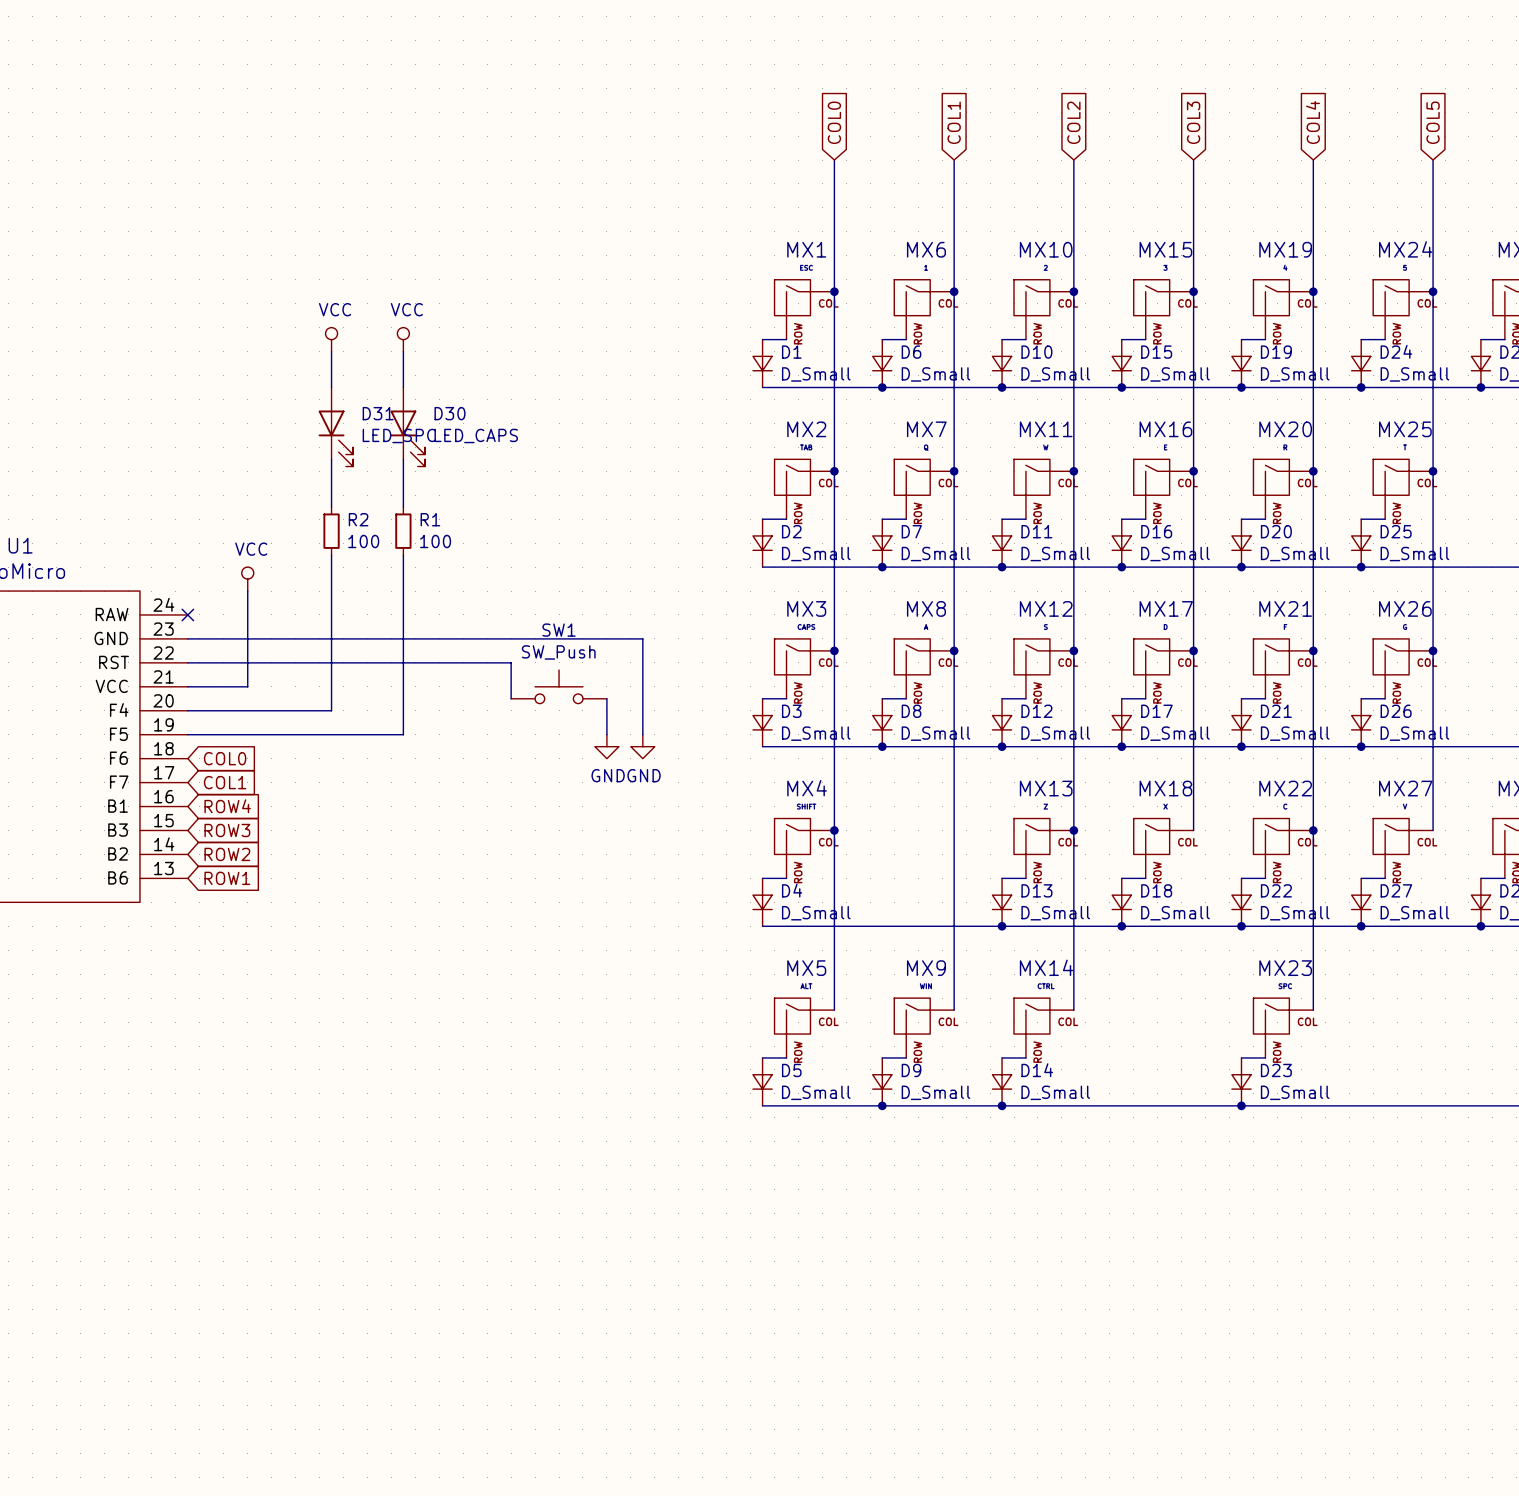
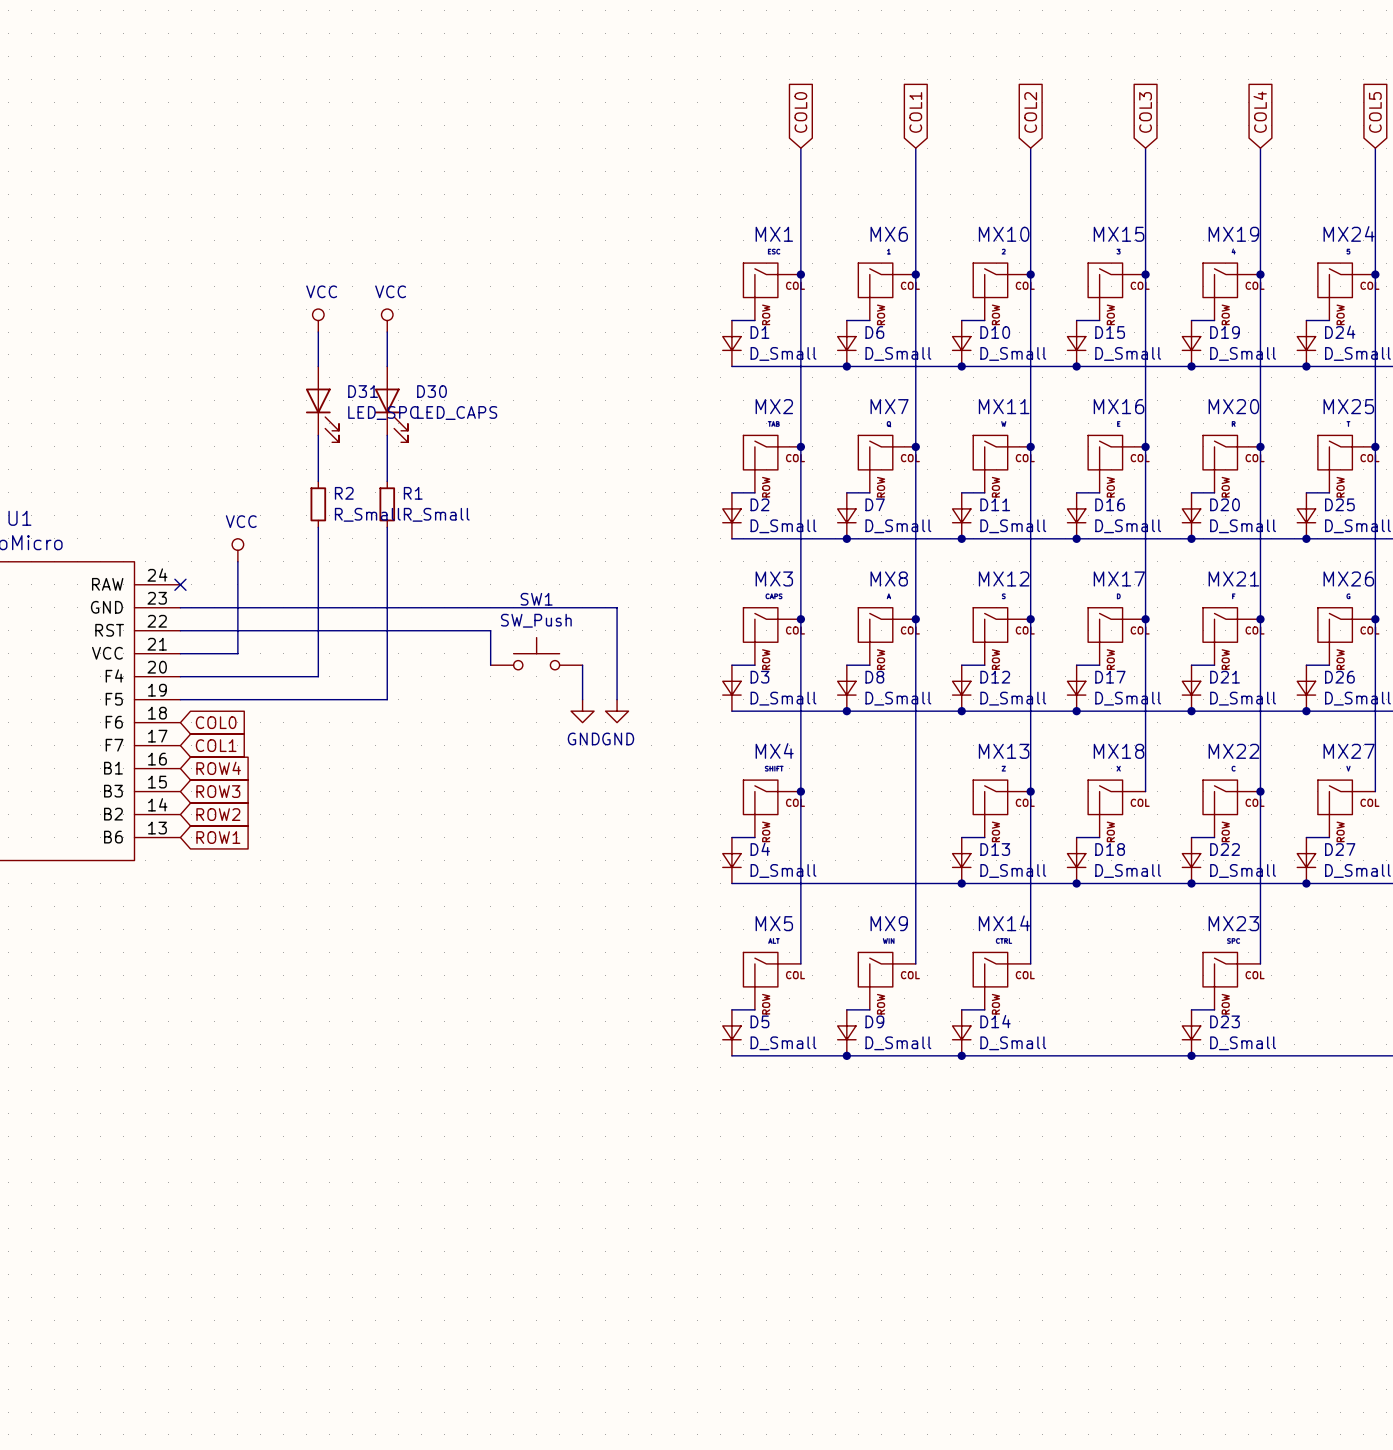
R2 value: 100 (363, 541) -> R_Small (367, 514)
R1 value: 100 (435, 541) -> R_Small (436, 514)

